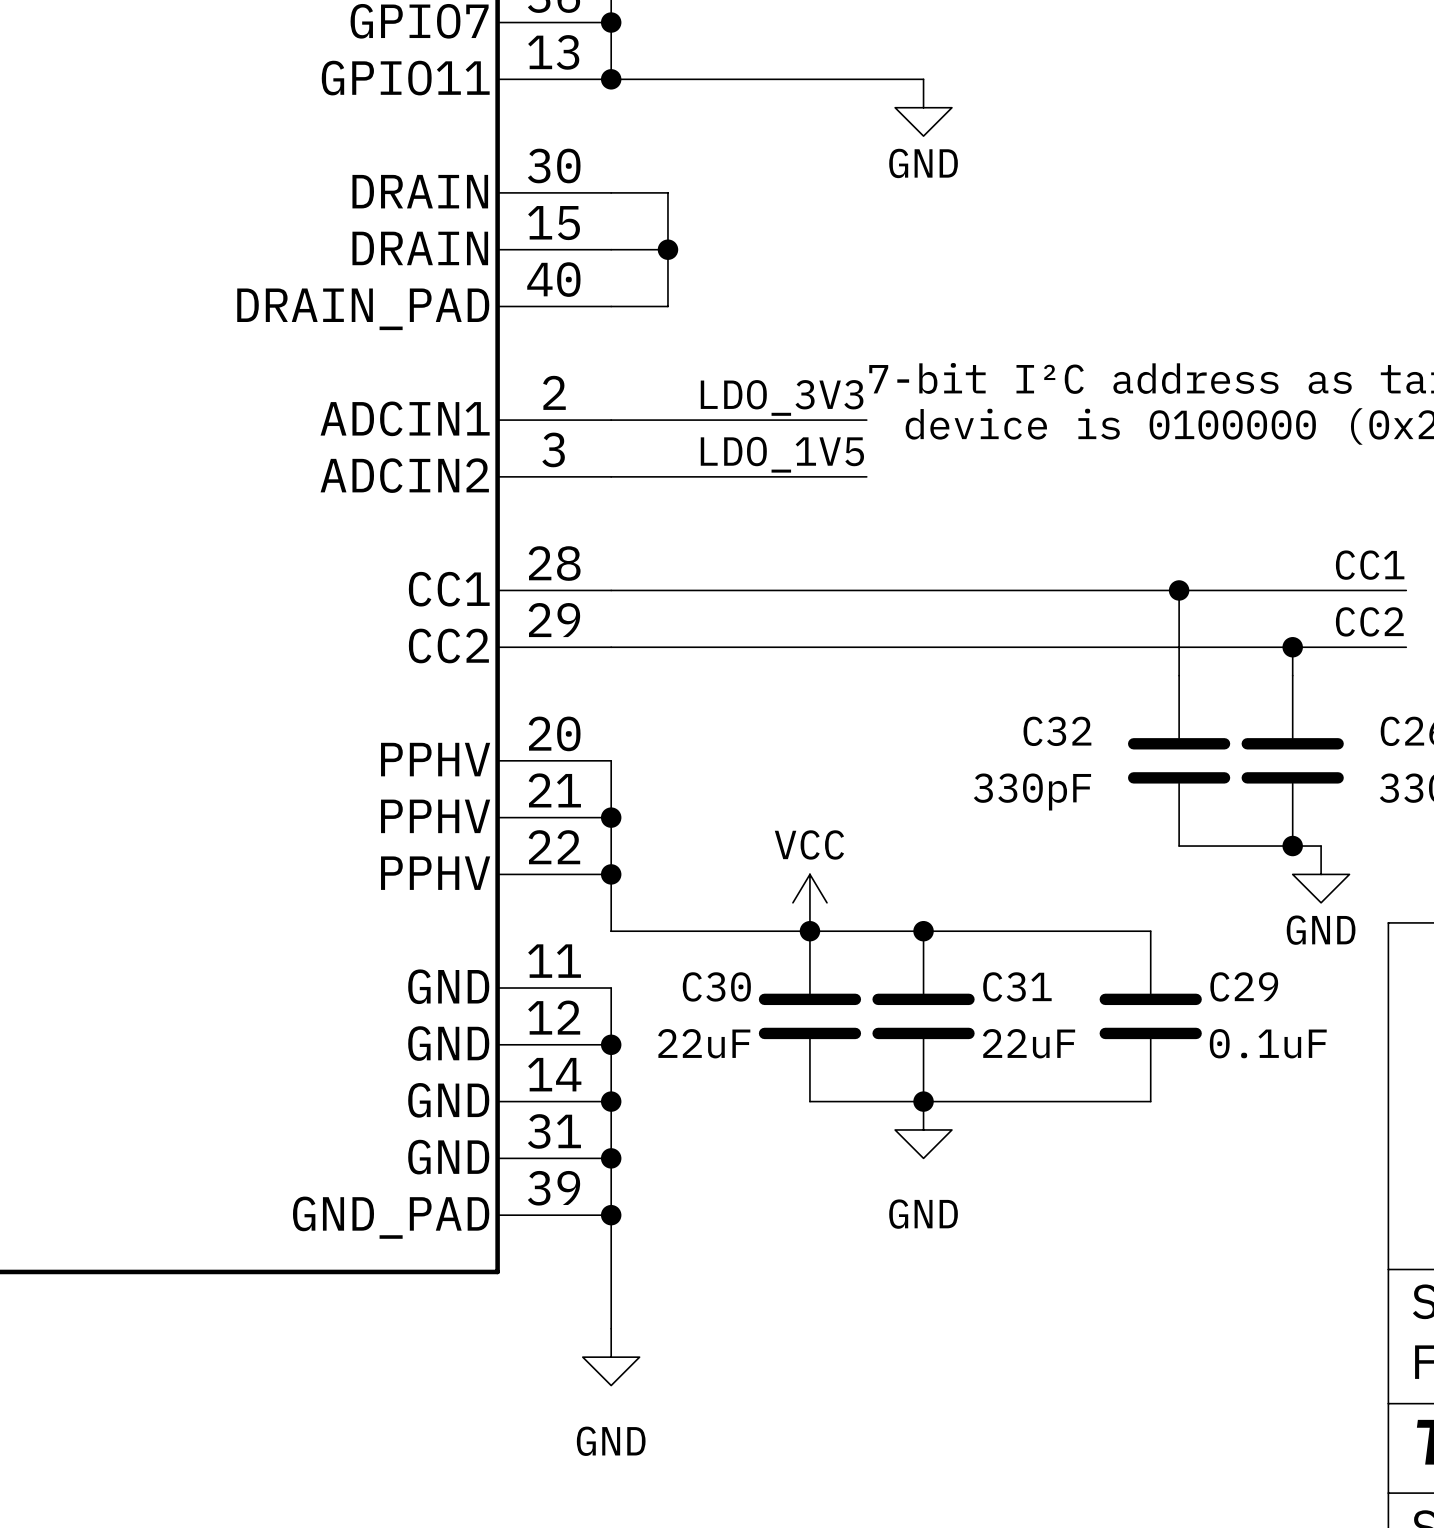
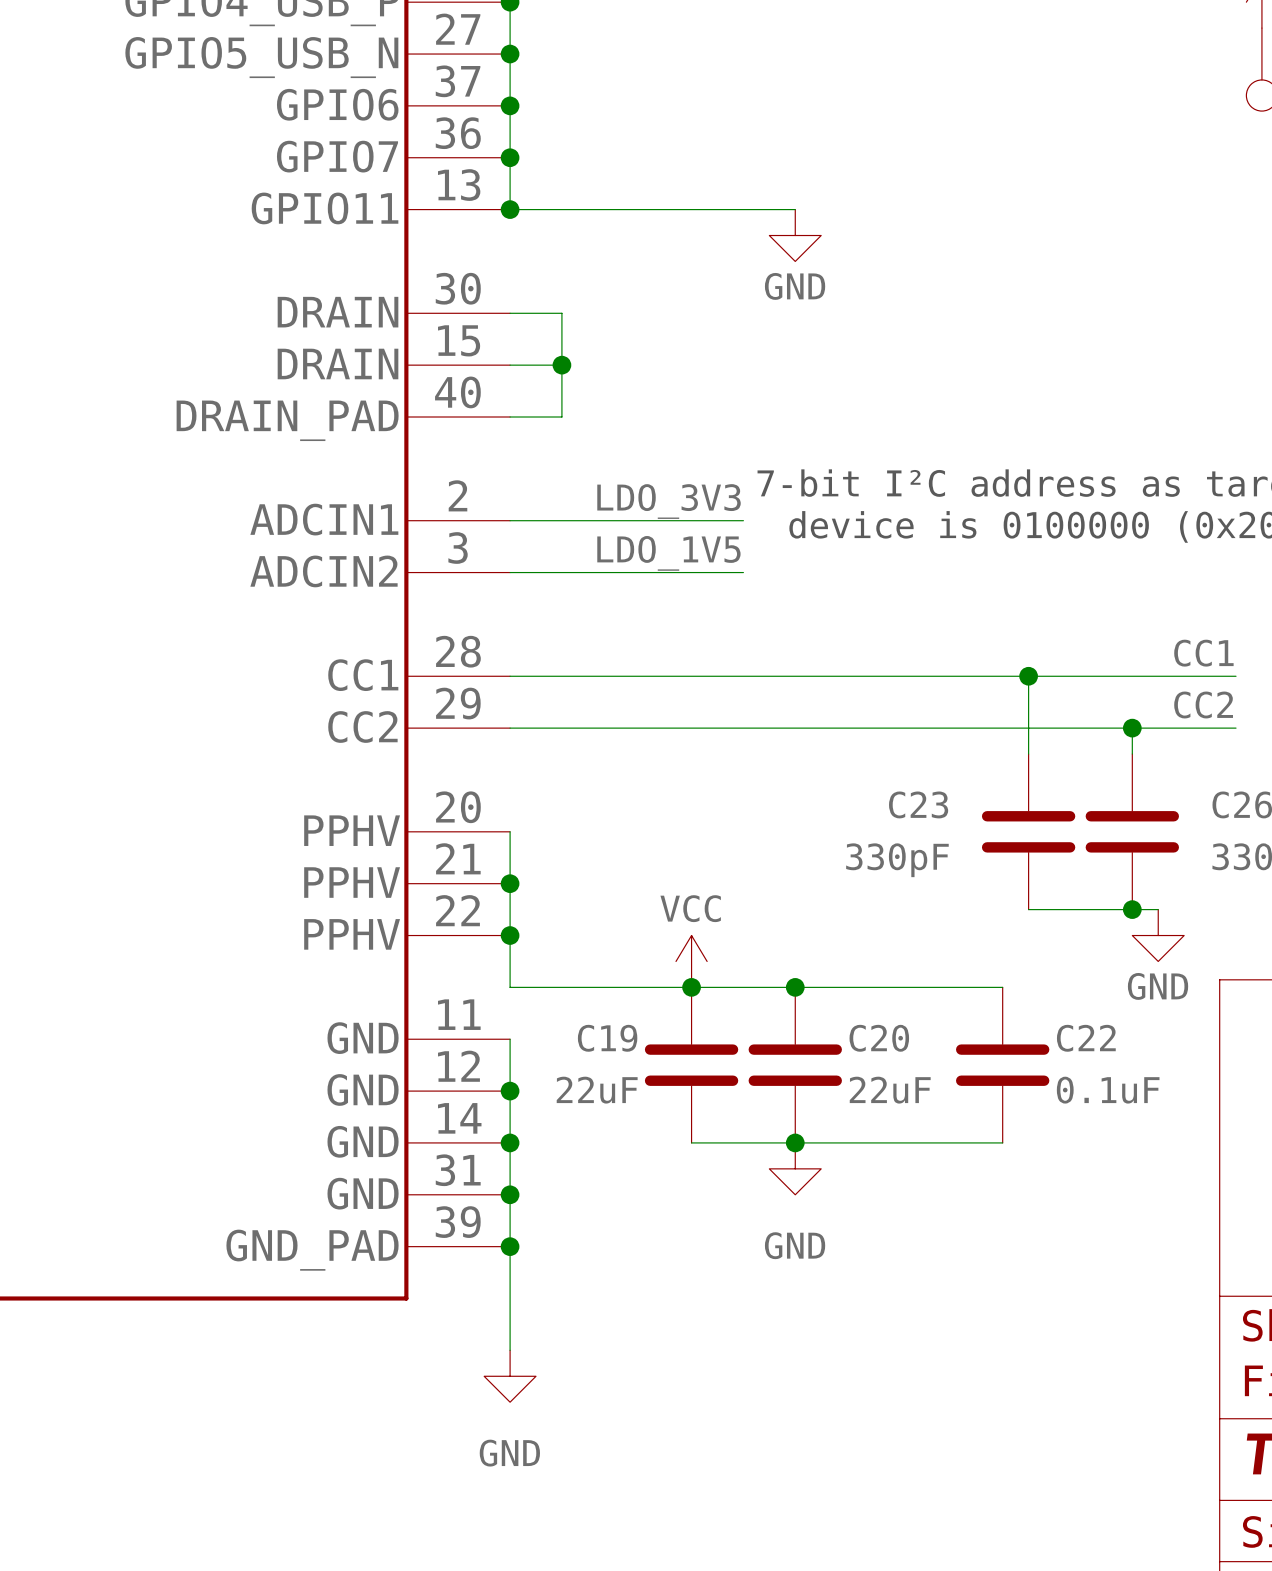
C32 name: C32 (1057, 731) -> C23 (918, 804)
C30 name: C30 (716, 986) -> C19 (607, 1038)
C31 name: C31 (1017, 986) -> C20 (879, 1038)
C29 name: C29 (1244, 986) -> C22 (1086, 1038)

